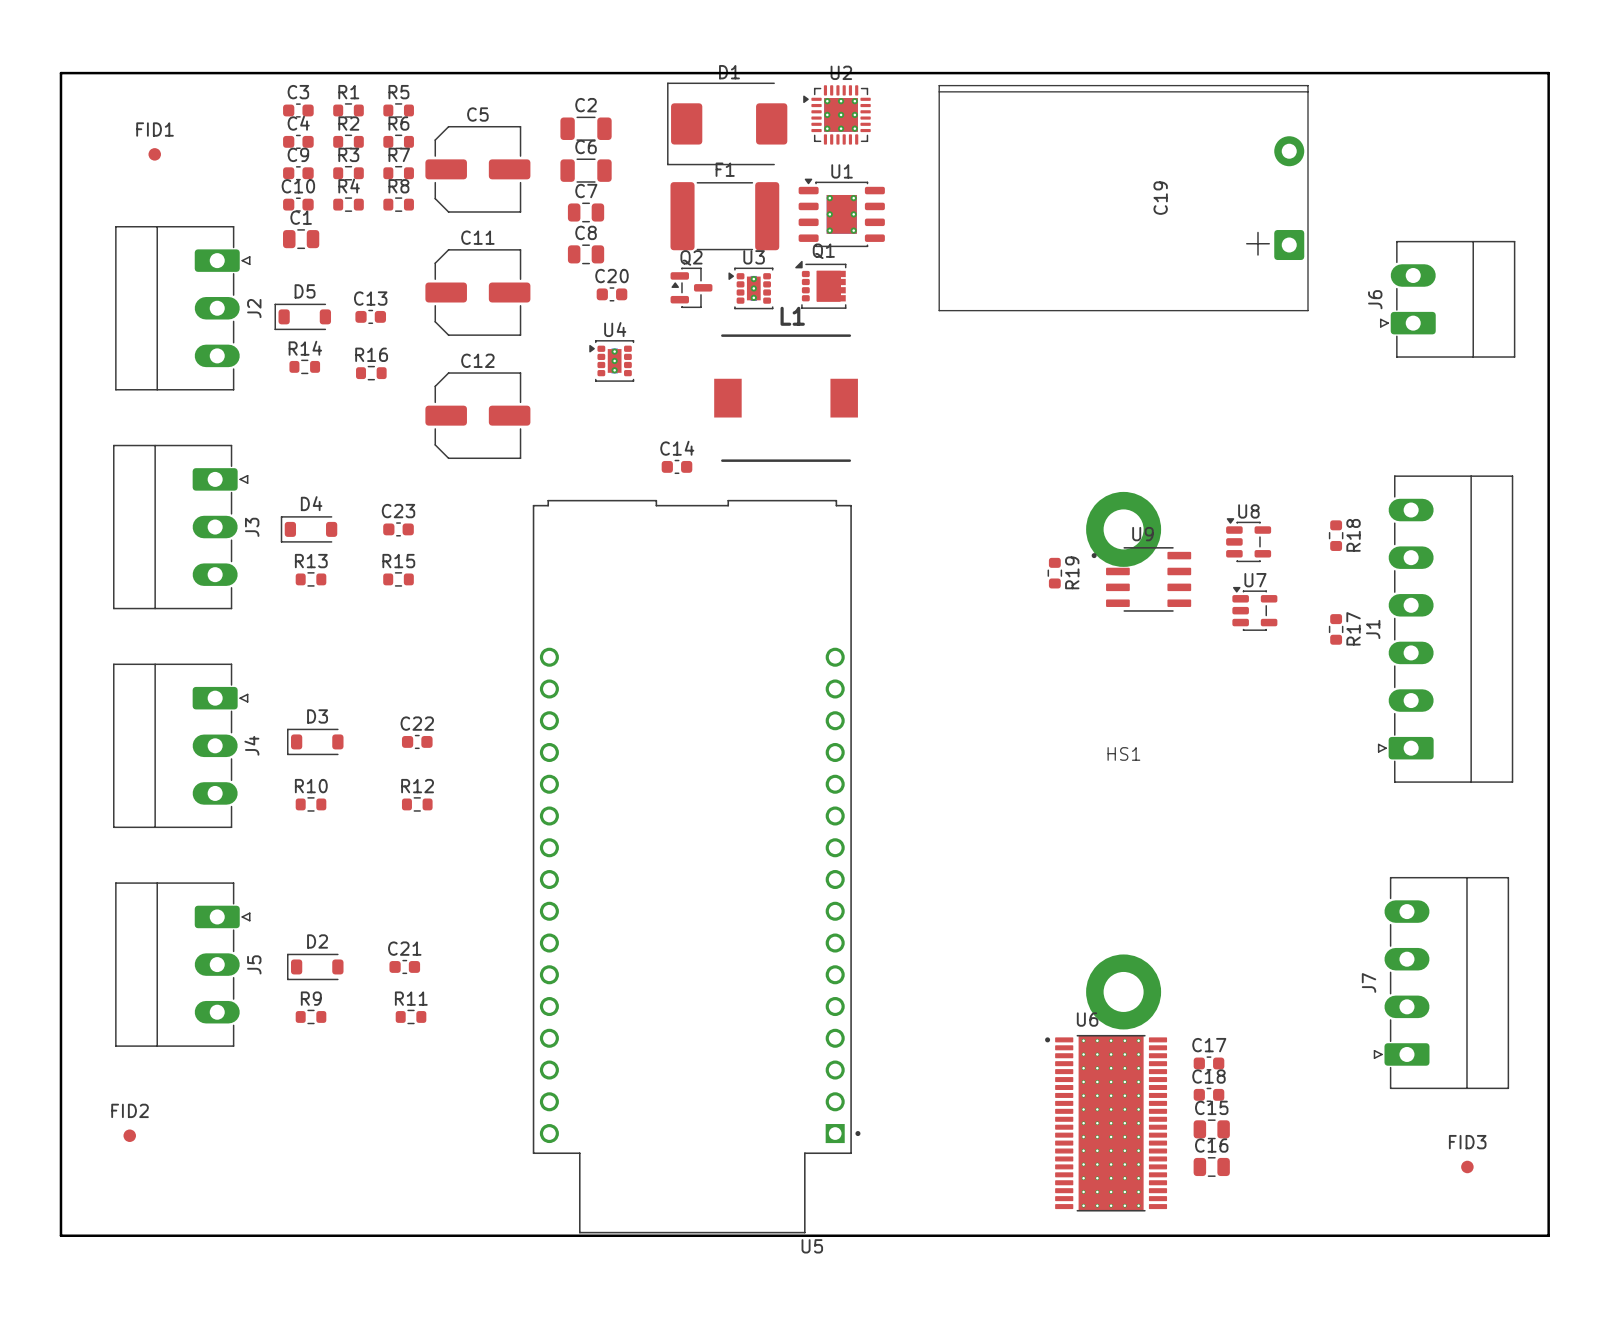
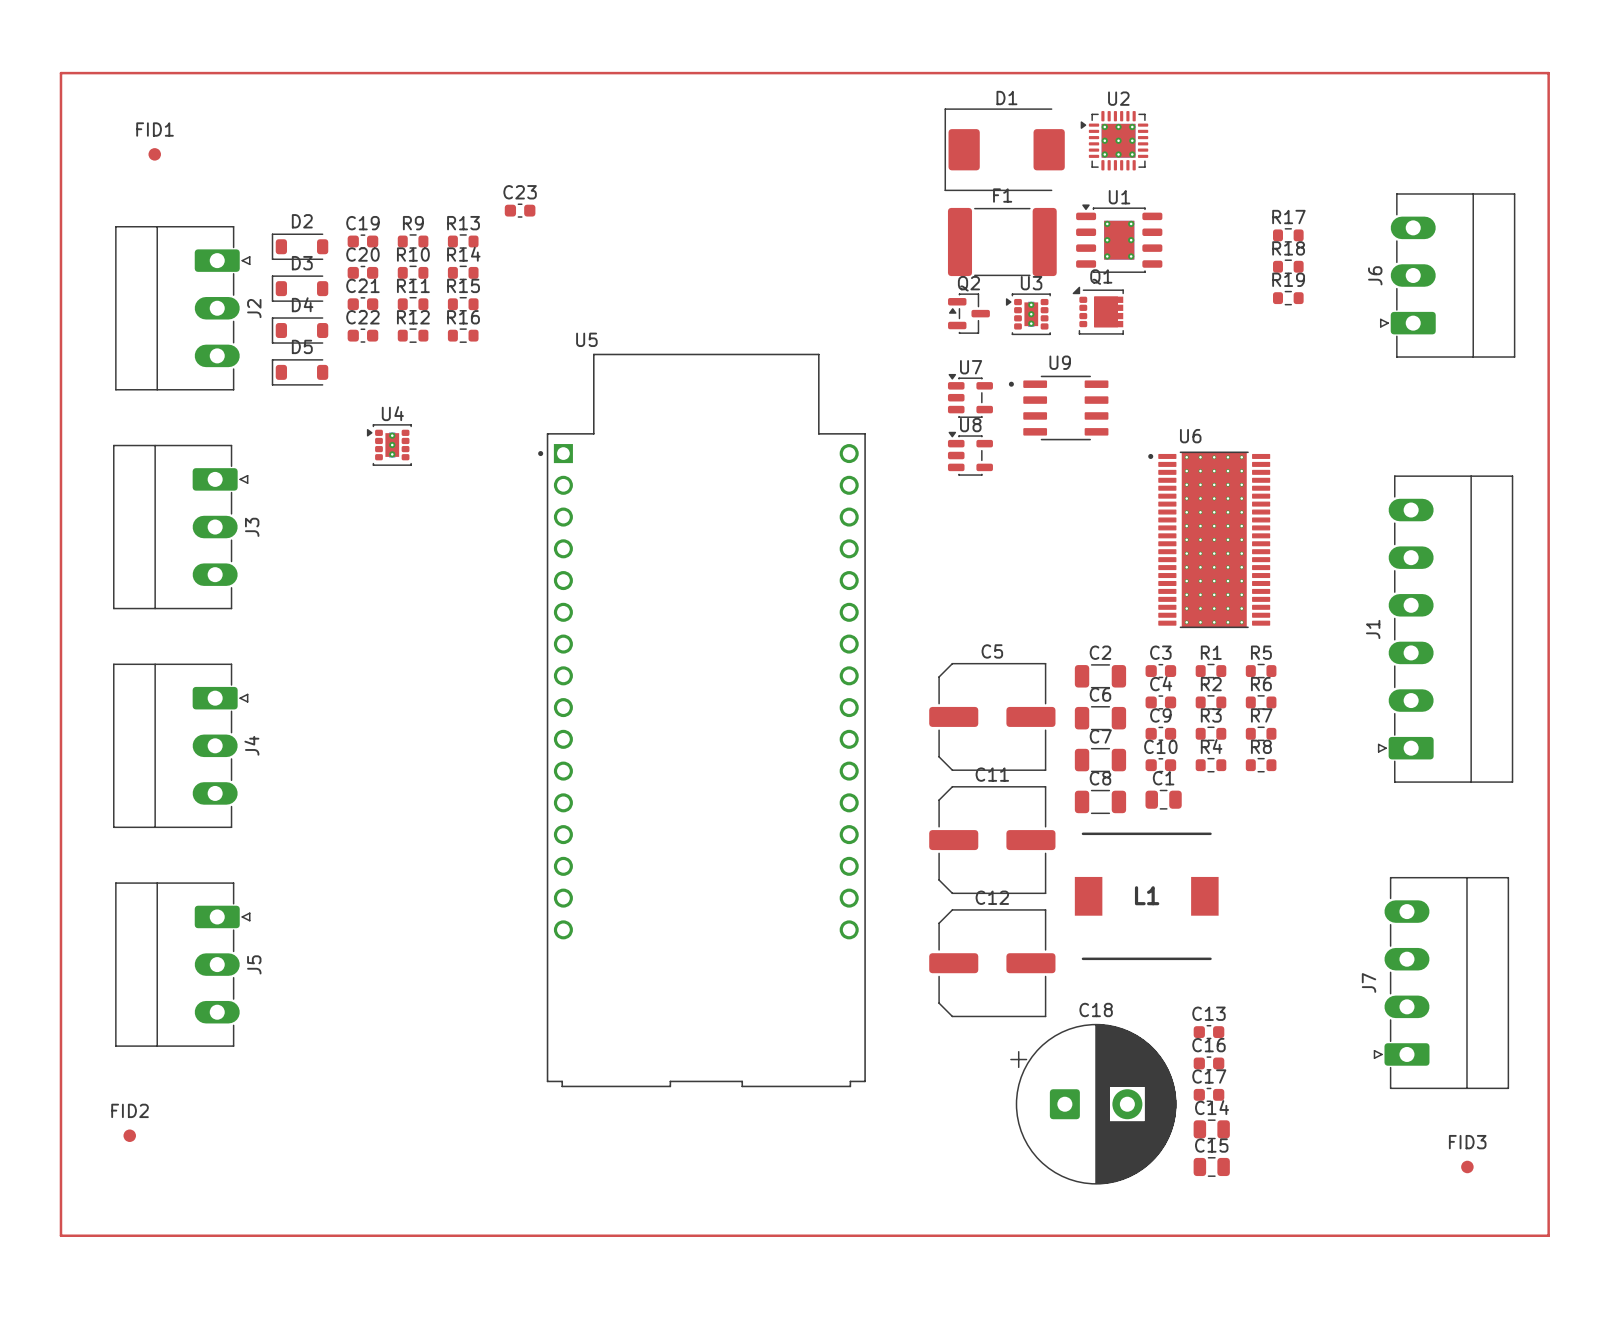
board edge: (60, 73) (1548, 73) (1548, 1235) (60, 1235) (60, 73) -> none
top track: none -> (60, 73) (1548, 73) (1548, 1235) (60, 1235) (60, 73)
C19 footprint: [938, 84, 1309, 312] -> [347, 234, 379, 249]
C3 position: (298, 110) -> (1160, 671)
R1 position: (348, 110) -> (1210, 671)
R5 position: (398, 110) -> (1261, 671)
U2 position: (836, 114) -> (1114, 140)
D1 position: (727, 123) -> (1004, 149)
C5 footprint: [425, 125, 531, 213] -> [929, 662, 1056, 771]
C2 position: (586, 128) -> (1100, 676)
C4 position: (298, 141) -> (1160, 702)
R2 position: (348, 141) -> (1210, 702)
R6 position: (398, 141) -> (1261, 702)
C6 position: (586, 170) -> (1100, 718)
C9 position: (298, 173) -> (1160, 733)
R3 position: (348, 173) -> (1210, 733)
R7 position: (398, 173) -> (1261, 733)
C19 name position: C19 (1160, 198) -> C19 (362, 223)
C7 footprint: [567, 202, 605, 223] -> [1074, 747, 1127, 773]
C10 position: (298, 204) -> (1160, 765)
R4 position: (348, 204) -> (1210, 765)
R8 position: (398, 204) -> (1261, 765)
U1 position: (841, 212) -> (1119, 238)
F1 position: (724, 216) -> (1002, 242)
C1 position: (301, 239) -> (1163, 799)
J6 footprint: [1379, 240, 1516, 358] -> [1379, 193, 1516, 358]
C8 footprint: [567, 244, 605, 265] -> [1074, 789, 1127, 815]
C11 footprint: [425, 249, 531, 336] -> [929, 786, 1056, 895]
Q1 position: (820, 284) -> (1098, 310)
Q2 position: (691, 287) -> (968, 313)
U3 position: (750, 288) -> (1028, 314)
C20 position: (611, 294) -> (362, 272)
D5 position: (302, 316) -> (300, 372)
C13 position: (370, 316) -> (1208, 1032)
L1 name position: L1 (792, 316) -> L1 (1147, 895)
U4 position: (611, 360) -> (389, 445)
R14 position: (304, 366) -> (463, 272)
C12 footprint: [425, 372, 531, 460] -> [929, 909, 1056, 1018]
R16 position: (371, 373) -> (463, 335)
L1 position: (786, 398) -> (1146, 896)
C14: (676, 466) -> none
D4 position: (309, 529) -> (300, 330)
C23 position: (398, 529) -> (520, 210)
R18 rotation: 0° (1336, 535) -> 90° clockwise (1288, 266)
R18 position: (1336, 535) -> (1288, 266)
R18 name position: R18 (1353, 535) -> R18 (1288, 248)
U8 position: (1248, 540) -> (970, 453)
R19 name position: R19 (1072, 572) -> R19 (1288, 279)
R19 rotation: 0° (1054, 573) -> 90° clockwise (1288, 298)
R19 position: (1054, 573) -> (1288, 298)
R13 position: (311, 579) -> (463, 241)
R15 position: (398, 579) -> (463, 304)
U9 position: (1141, 579) -> (1058, 408)
U7 position: (1254, 608) -> (970, 395)
R17 name position: R17 (1353, 628) -> R17 (1288, 217)
R17 rotation: 0° (1336, 629) -> 90° clockwise (1288, 235)
R17 position: (1336, 629) -> (1288, 235)
D3 position: (315, 741) -> (300, 288)
C22 position: (417, 741) -> (362, 335)
HS1: (1123, 760) -> none
R10 position: (311, 804) -> (413, 272)
R12 position: (417, 804) -> (413, 335)
U5 rotation: 0° (696, 866) -> 180° (702, 720)
D2 position: (315, 966) -> (300, 246)
C21 position: (404, 966) -> (362, 304)
R9 position: (311, 1016) -> (413, 241)
R11 position: (411, 1016) -> (413, 304)
C17 name: C17 (1209, 1045) -> C16 (1208, 1045)
C18 name: C18 (1208, 1076) -> C17 (1209, 1076)
C18: none -> (1093, 1104)
C15 name: C15 (1211, 1107) -> C14 (1212, 1107)
U6 position: (1106, 1123) -> (1209, 539)
C16 name: C16 (1211, 1145) -> C15 (1211, 1145)

